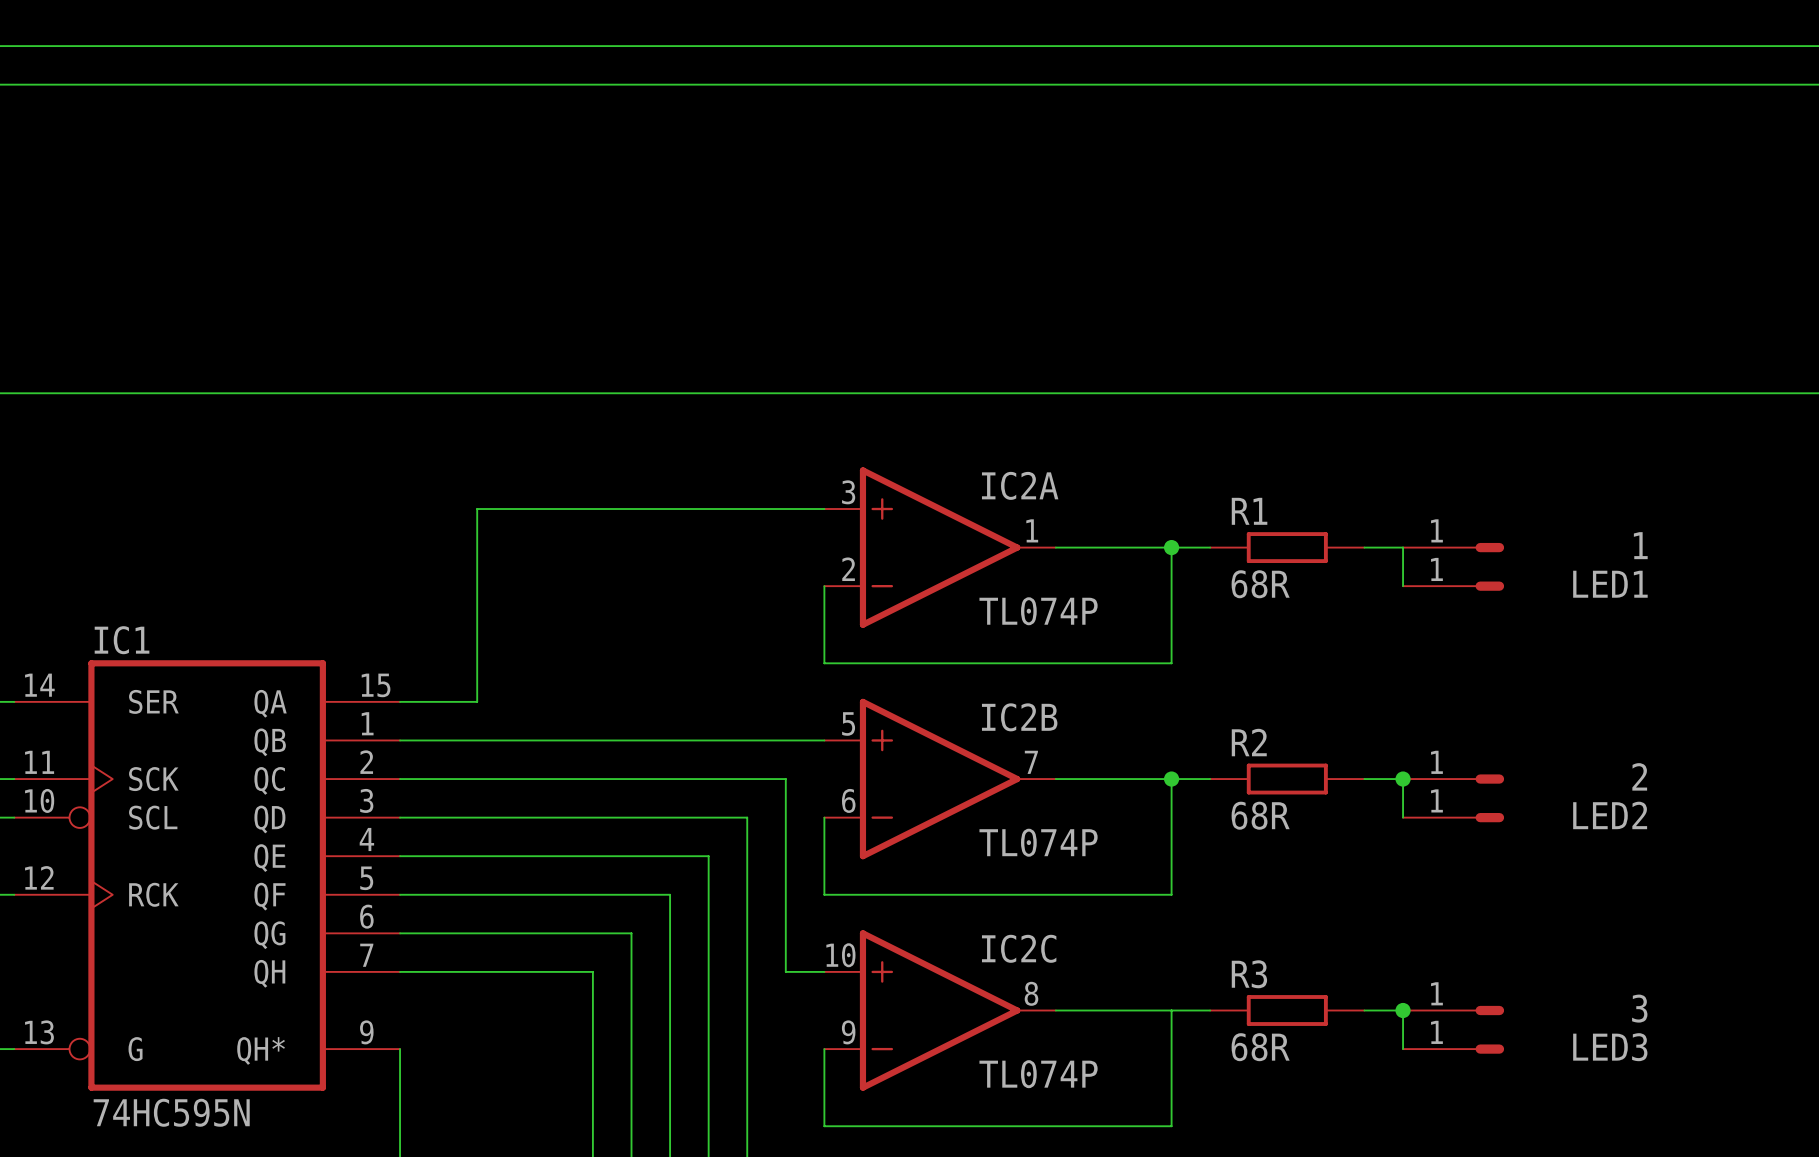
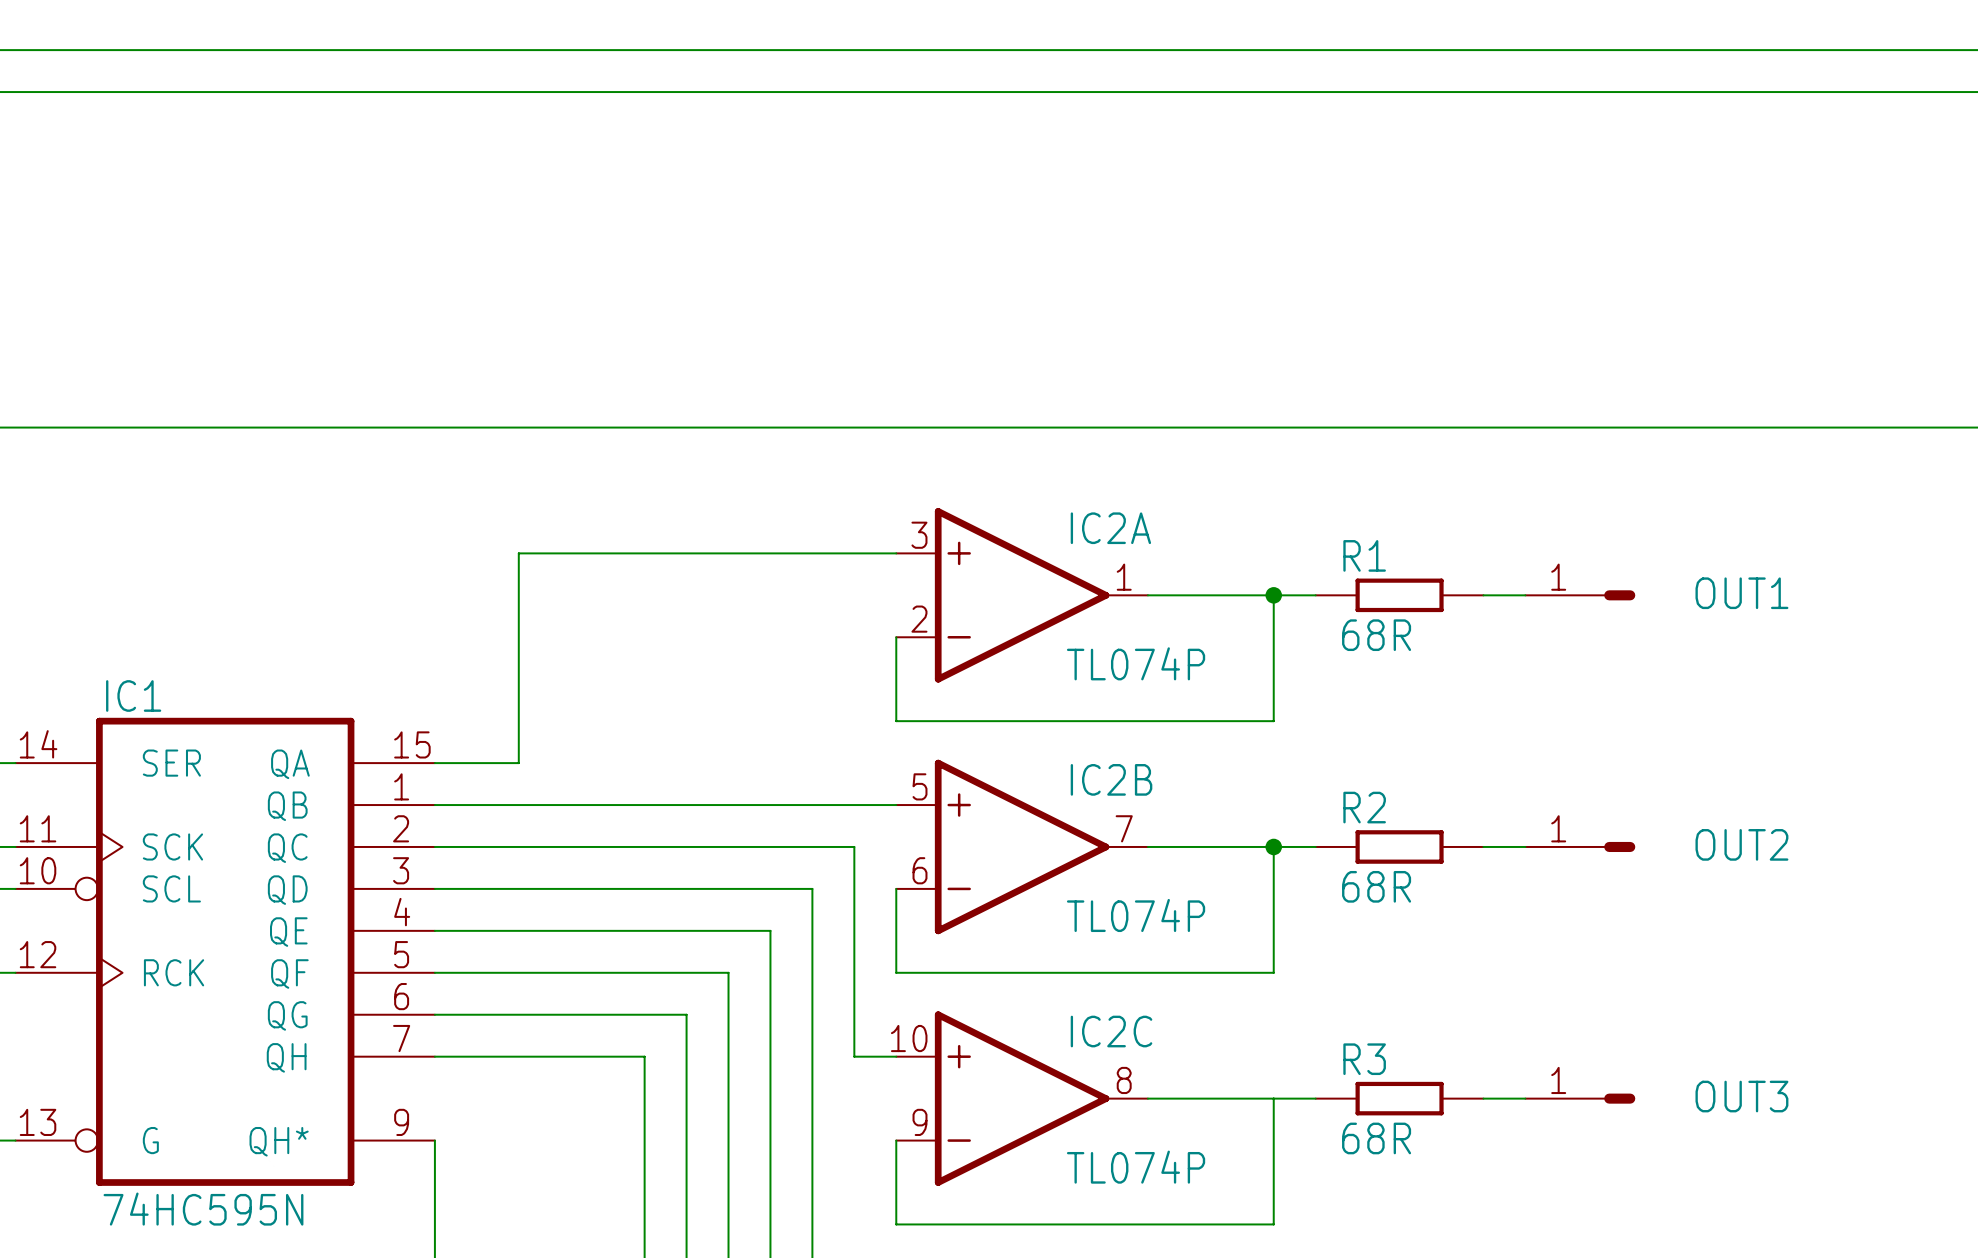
1 name: 1 (1640, 545) -> OUT1 (1741, 593)
wire: (1403, 547) (1403, 586) -> none
LED1: (1453, 586) -> none
2 name: 2 (1639, 776) -> OUT2 (1741, 844)
wire: (1403, 779) (1403, 817) -> none
junction: (1403, 779) -> none
LED2: (1453, 817) -> none
3 name: 3 (1639, 1008) -> OUT3 (1741, 1096)
wire: (1403, 1010) (1403, 1049) -> none
junction: (1403, 1010) -> none
LED3: (1453, 1049) -> none

